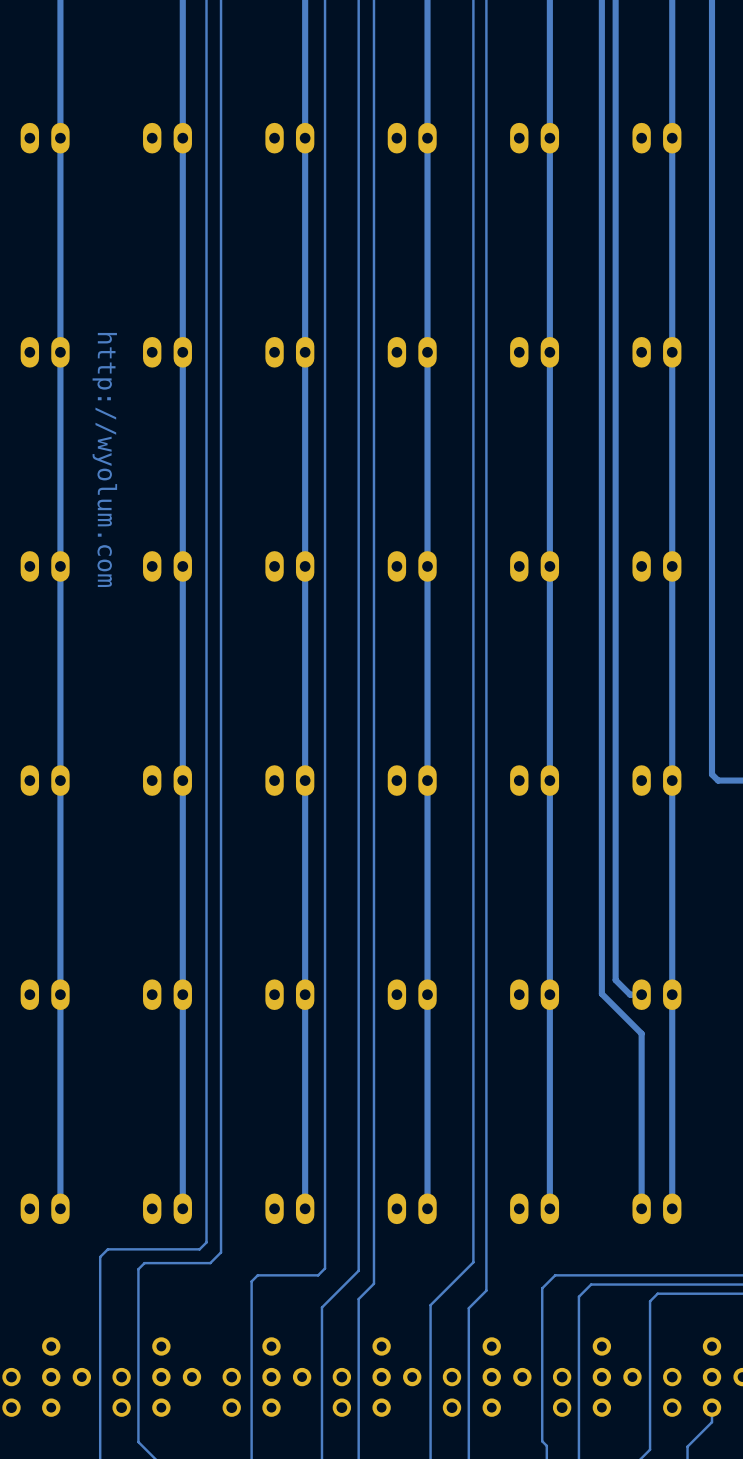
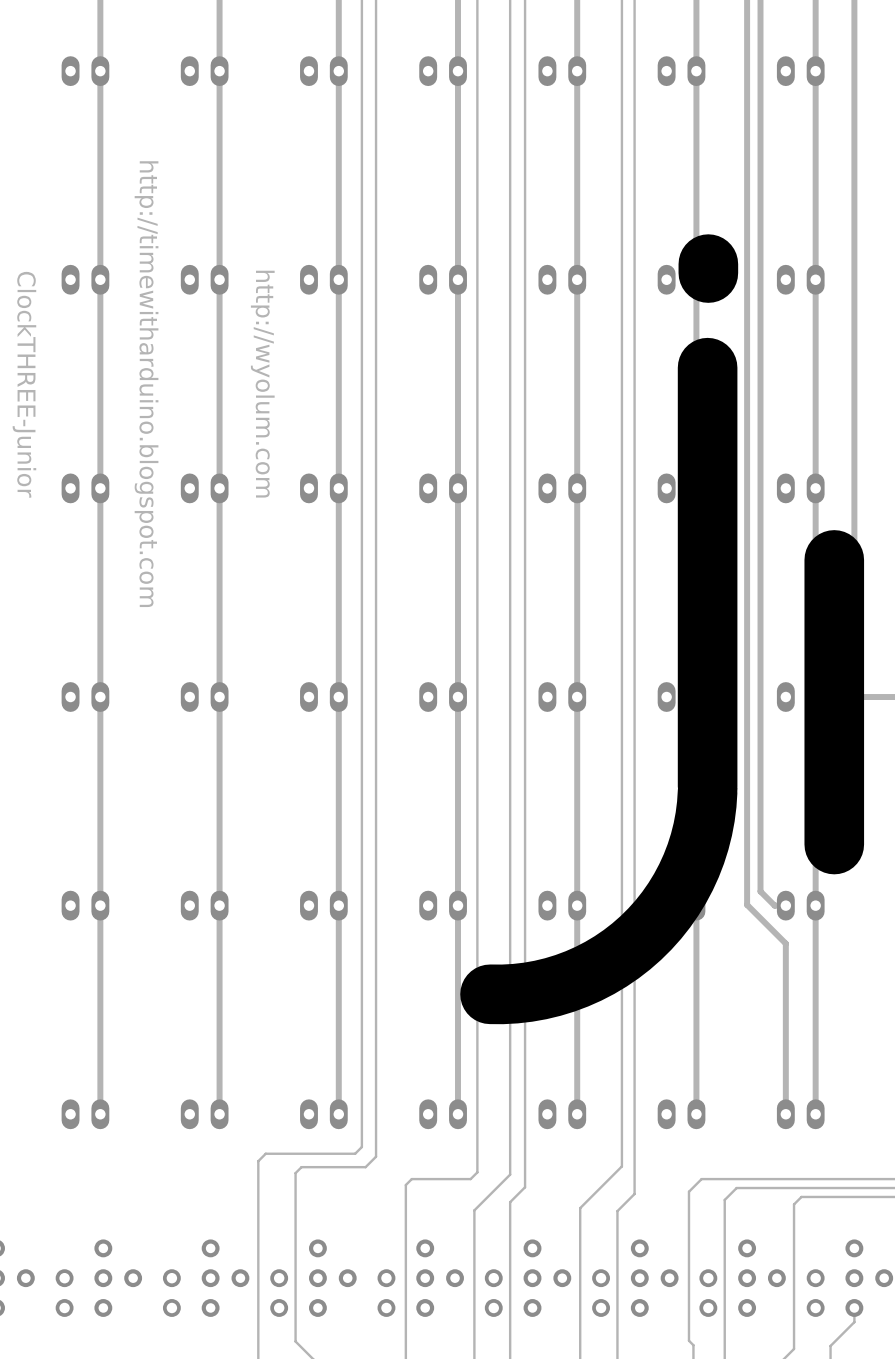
line: none -> (708, 264) (708, 273)
line: none -> (707, 367) (707, 786)
line: none -> (834, 559) (834, 844)
line: none -> (707, 791) (702, 829) (691, 865) (673, 899) (658, 919) (640, 938) (610, 961) (576, 978) (540, 989) (515, 993) (490, 994)

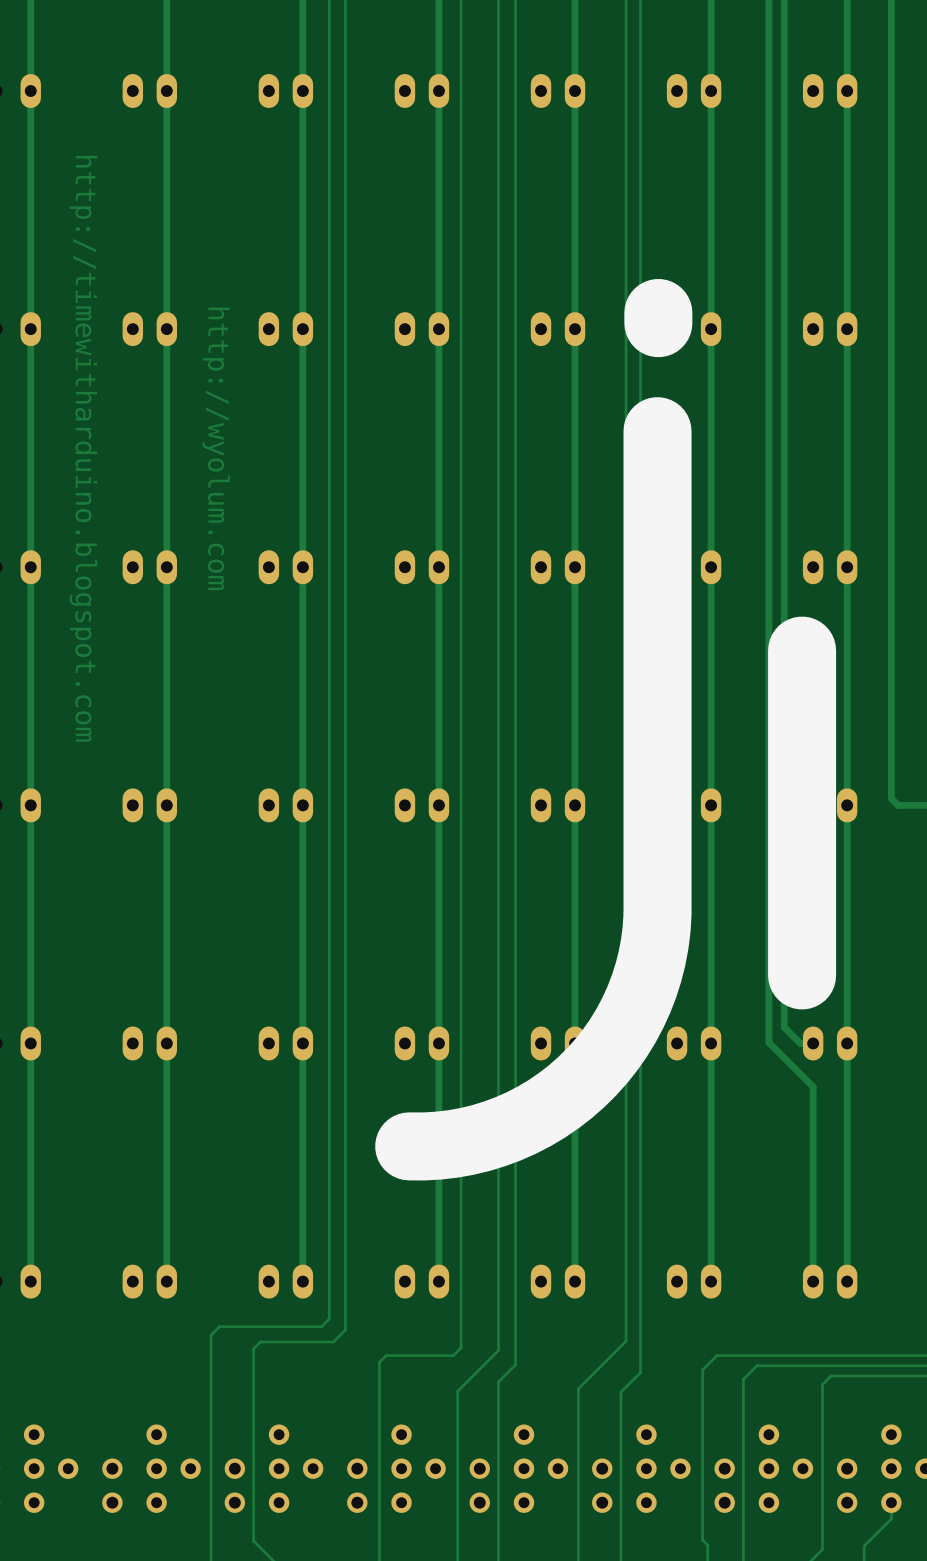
line: (708, 264) (708, 273) -> (658, 312) (658, 323)
line: (707, 367) (707, 786) -> (657, 431) (657, 909)
line: (834, 559) (834, 844) -> (802, 650) (802, 975)
line: (707, 791) (702, 829) (691, 865) (673, 899) (658, 919) (640, 938) (610, 961) (576, 978) (540, 989) (515, 993) (490, 994) -> (657, 915) (652, 958) (638, 999) (618, 1037) (601, 1061) (581, 1082) (546, 1108) (521, 1122) (494, 1133) (452, 1143) (409, 1146)

